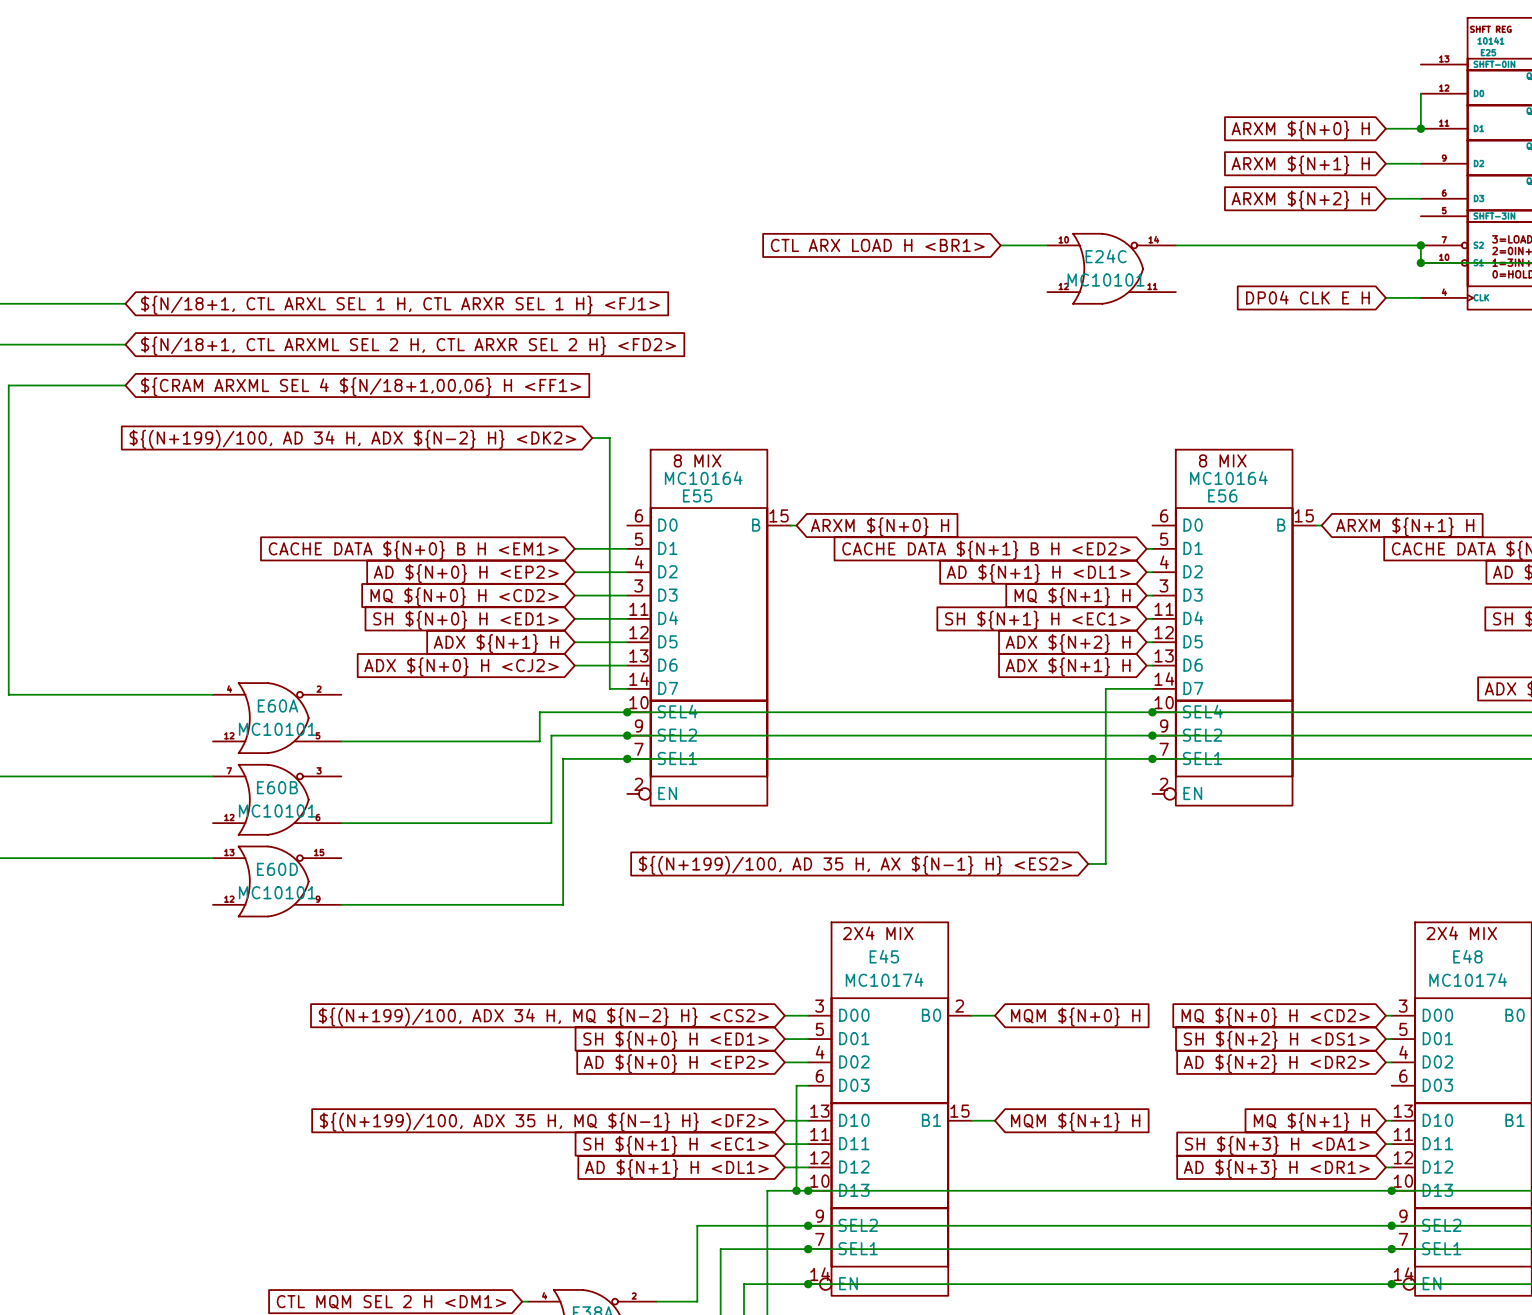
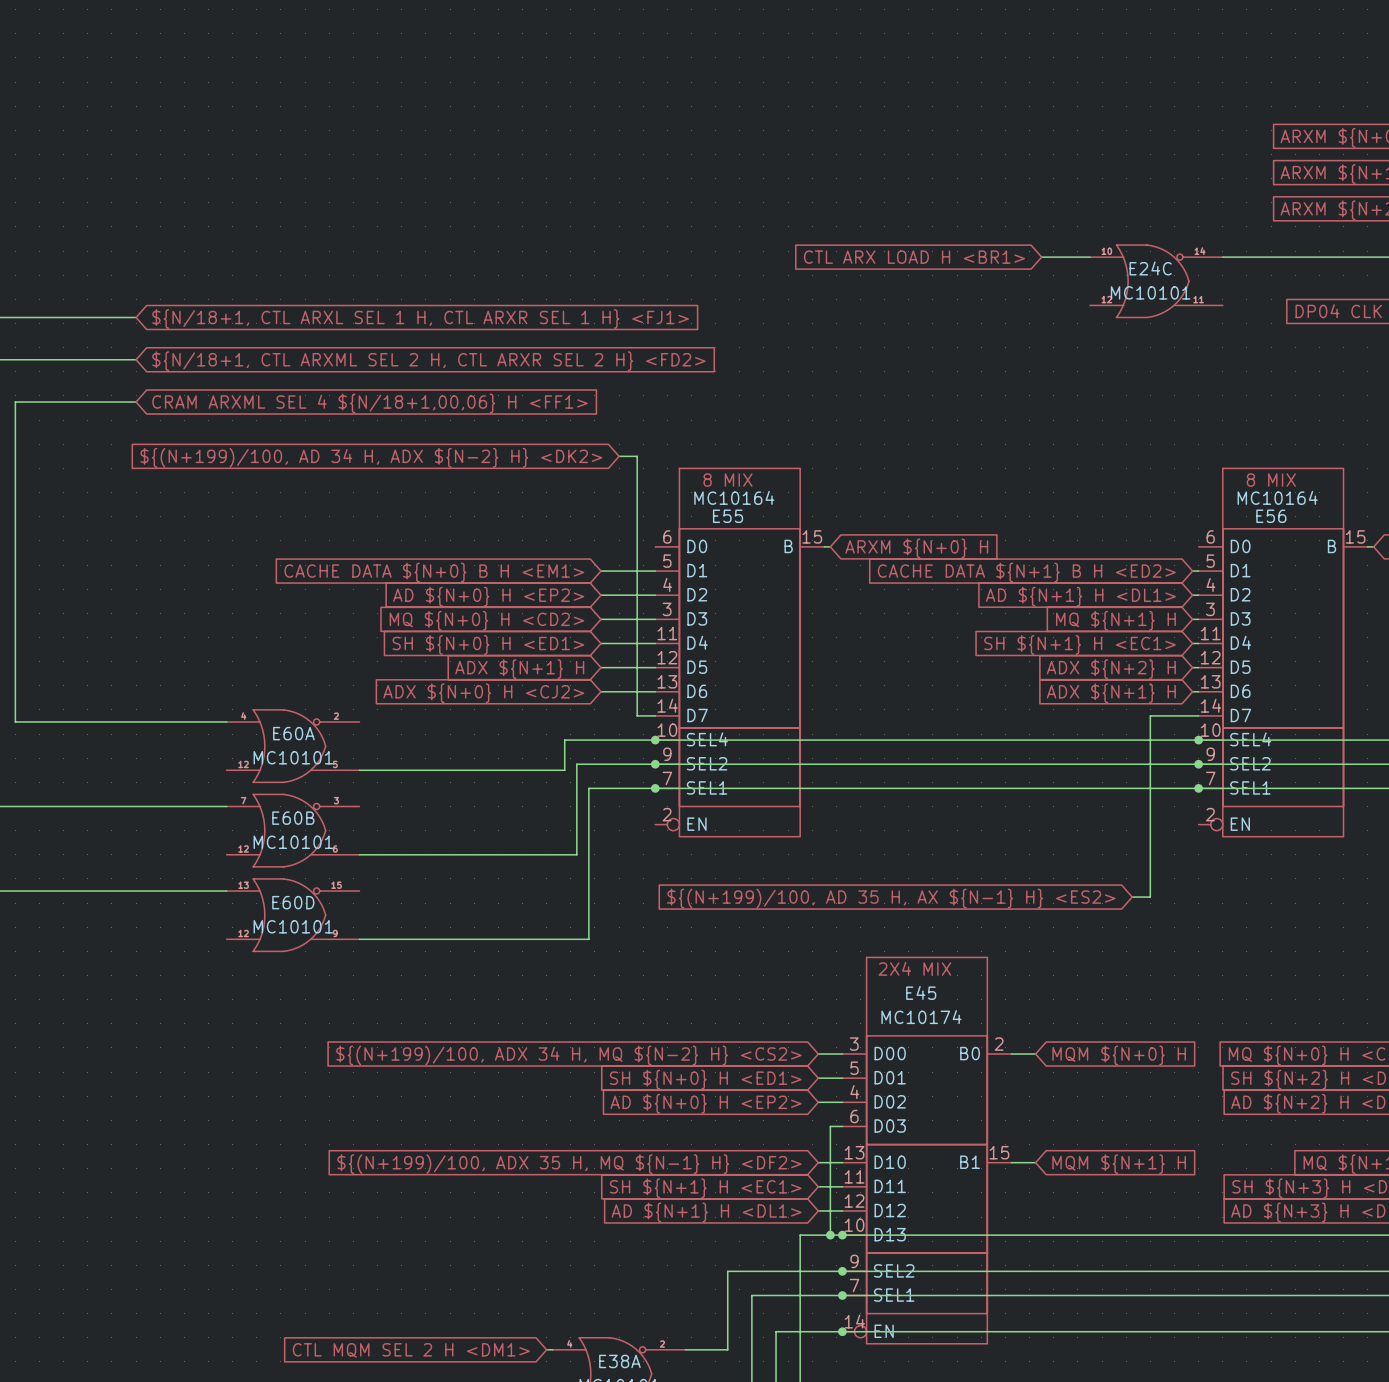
global label: ${CRAM ARXML SEL 4 ${N/18+1,00,06} H <FF1> (360, 386) -> CRAM ARXML SEL 4 ${N/18+1,00,06} H <FF1> (369, 403)

